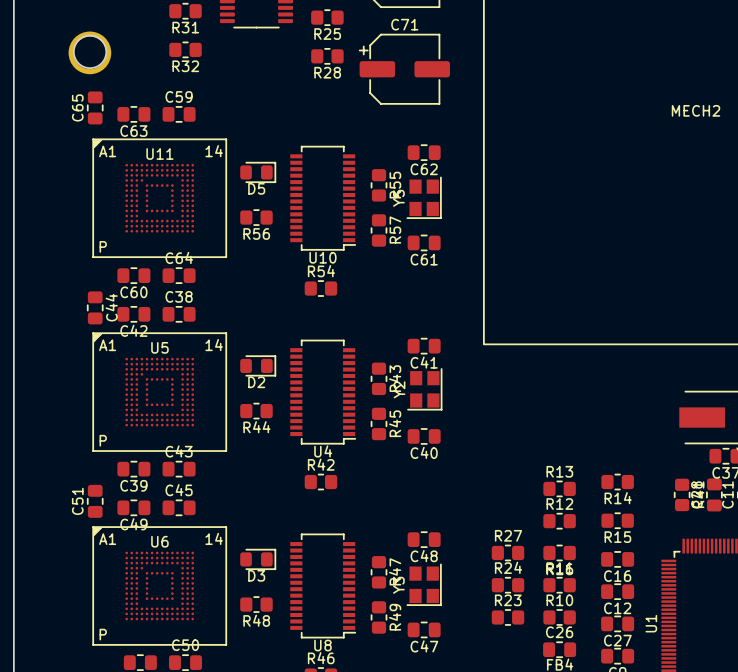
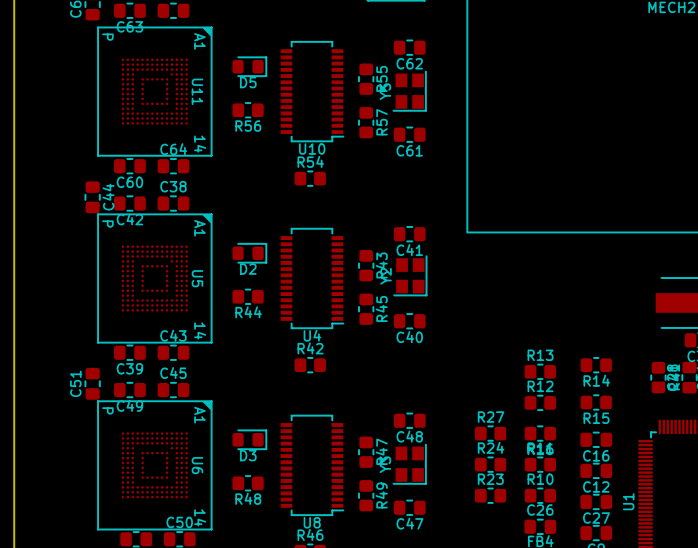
U11 rotation: 0° (159, 198) -> 90° clockwise (154, 91)
U5 rotation: 0° (159, 392) -> 90° clockwise (154, 278)
U6 rotation: 0° (159, 585) -> 90° clockwise (154, 465)

